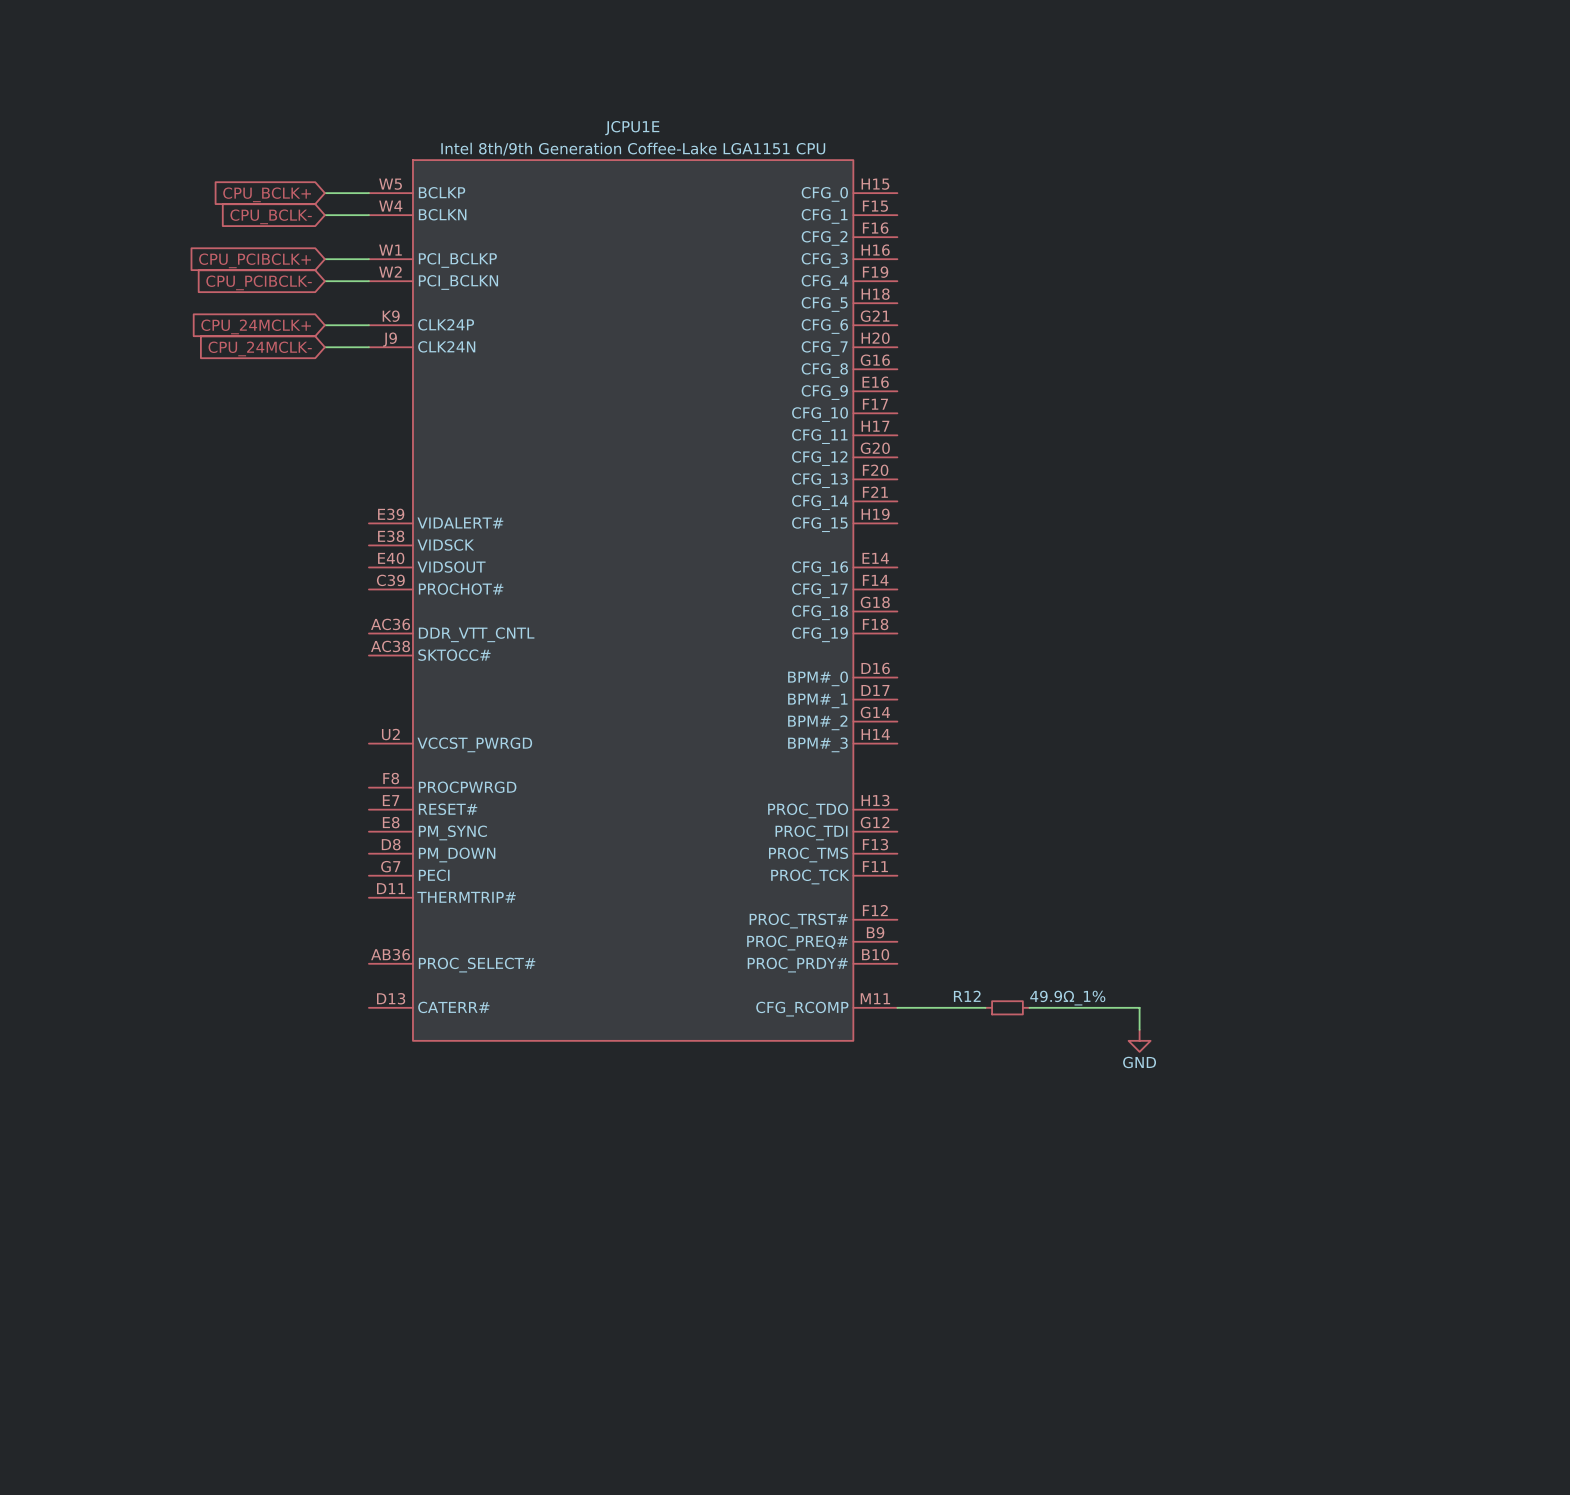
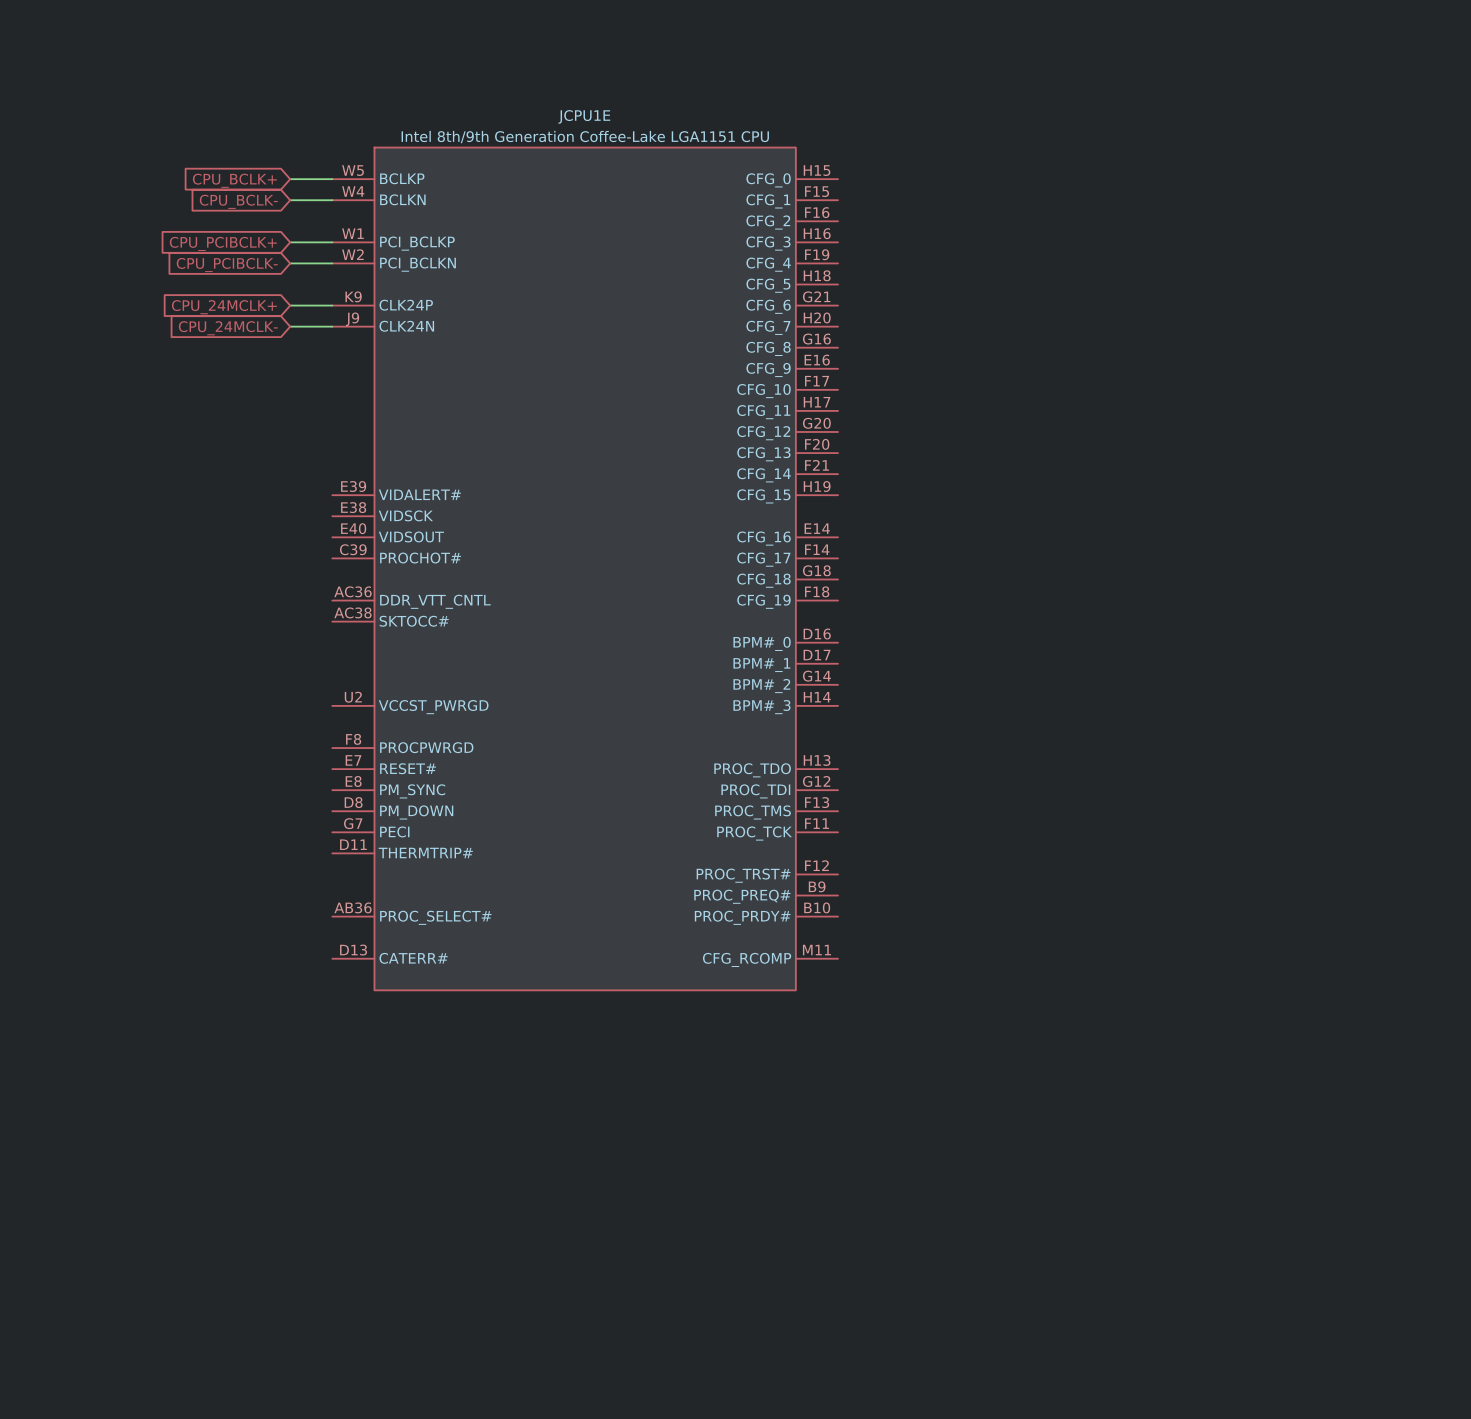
wire: (897, 1007) (985, 1007) -> none
R12: 49.9Ω_1% (1007, 1007) -> none
wire: (1029, 1007) (1139, 1007) (1139, 1029) -> none
power symbol: GND (1139, 1040) -> none

